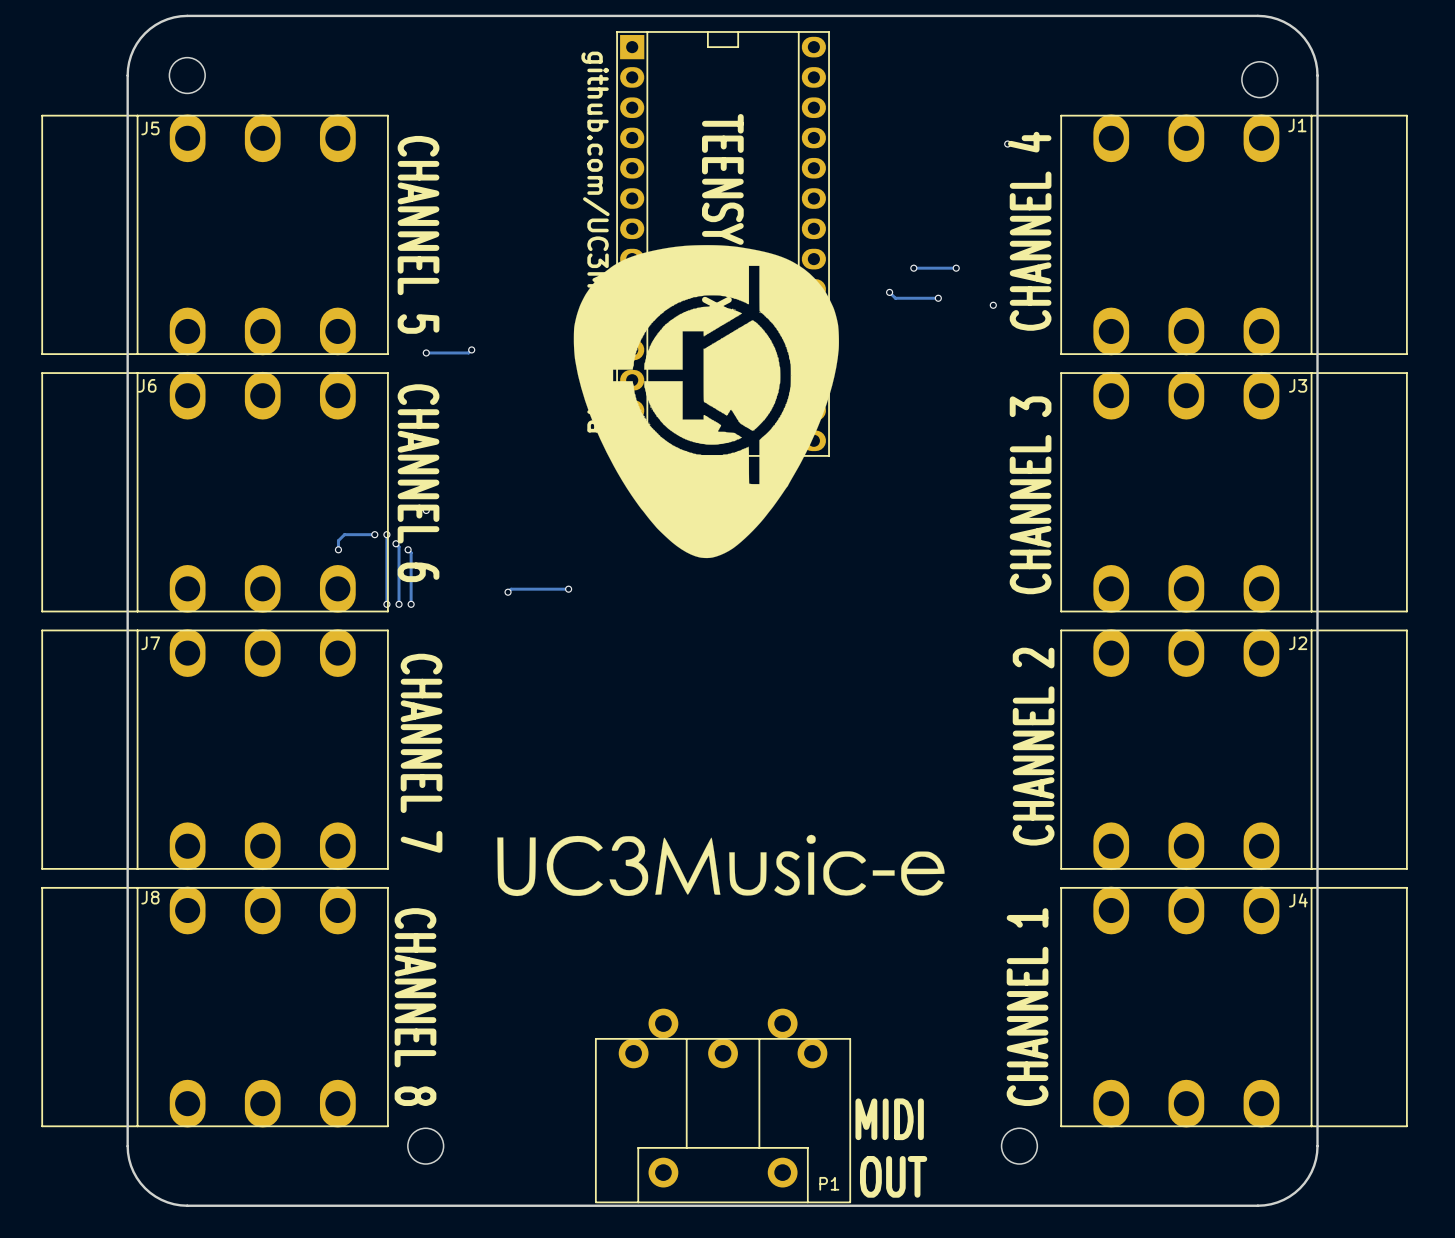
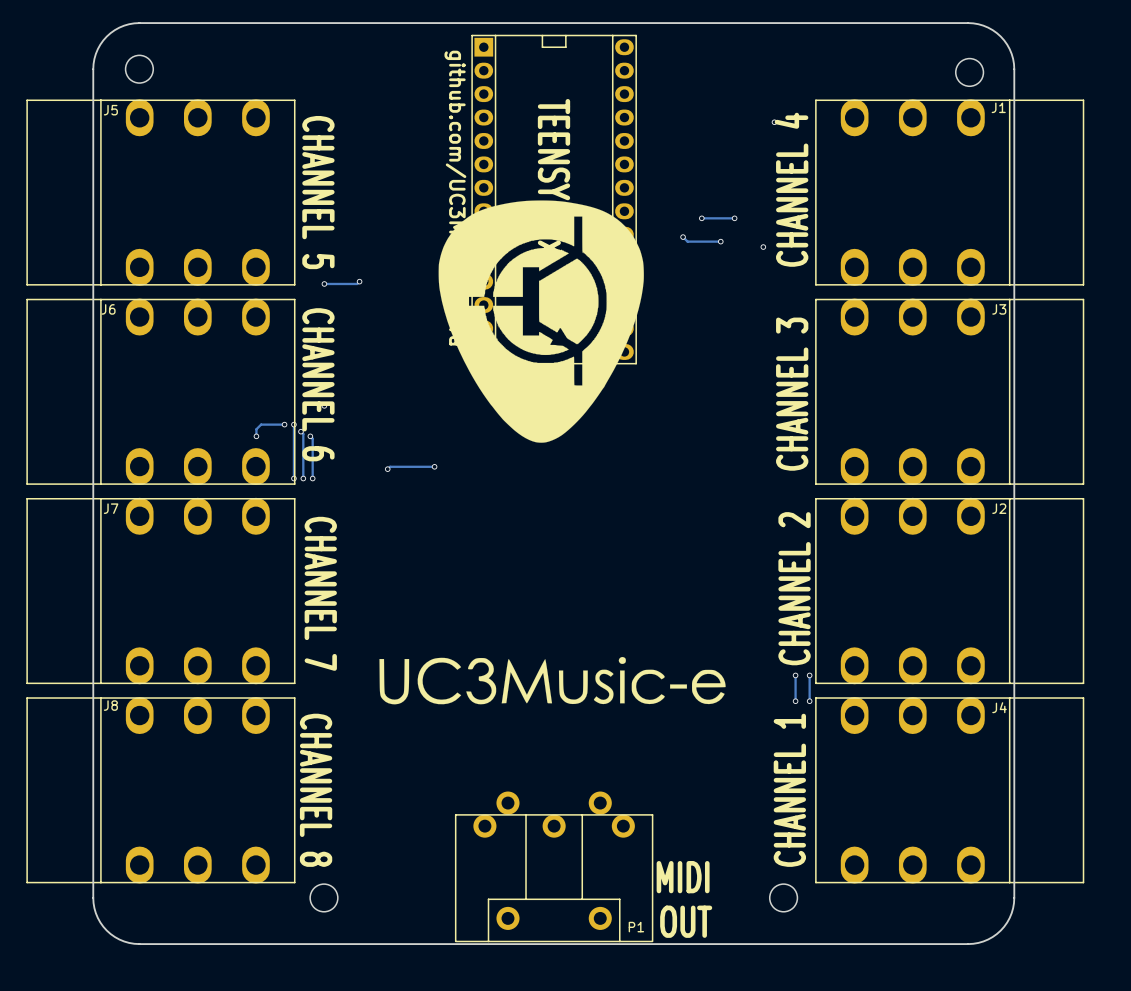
track: none -> (795, 675) (795, 701)
via: none -> (795, 675)
track: none -> (809, 675) (809, 701)
via: none -> (809, 675)
via: none -> (795, 701)
via: none -> (809, 701)

